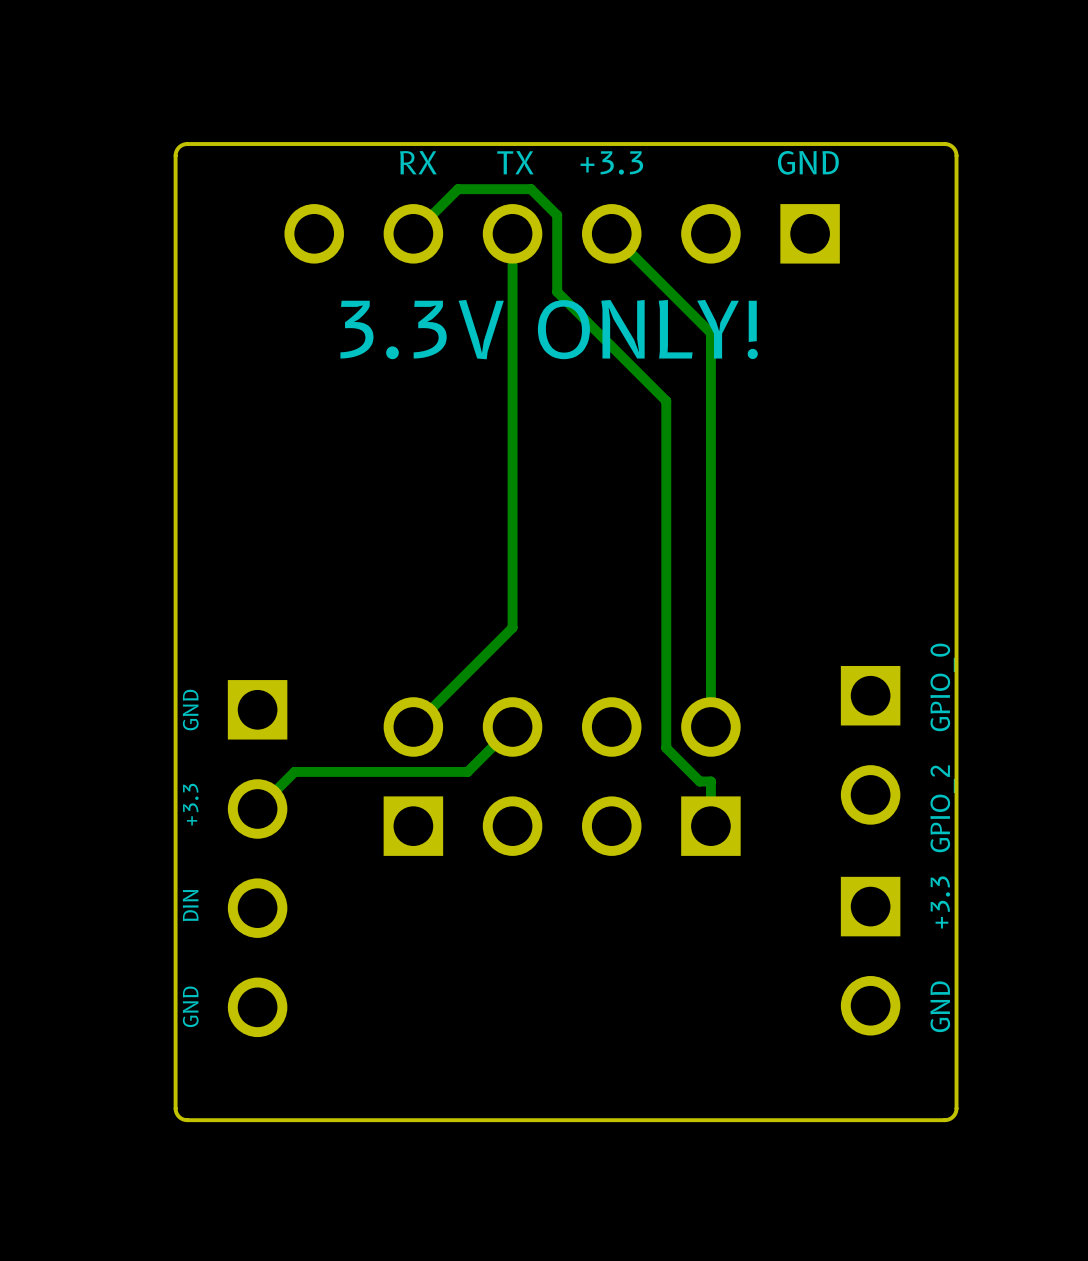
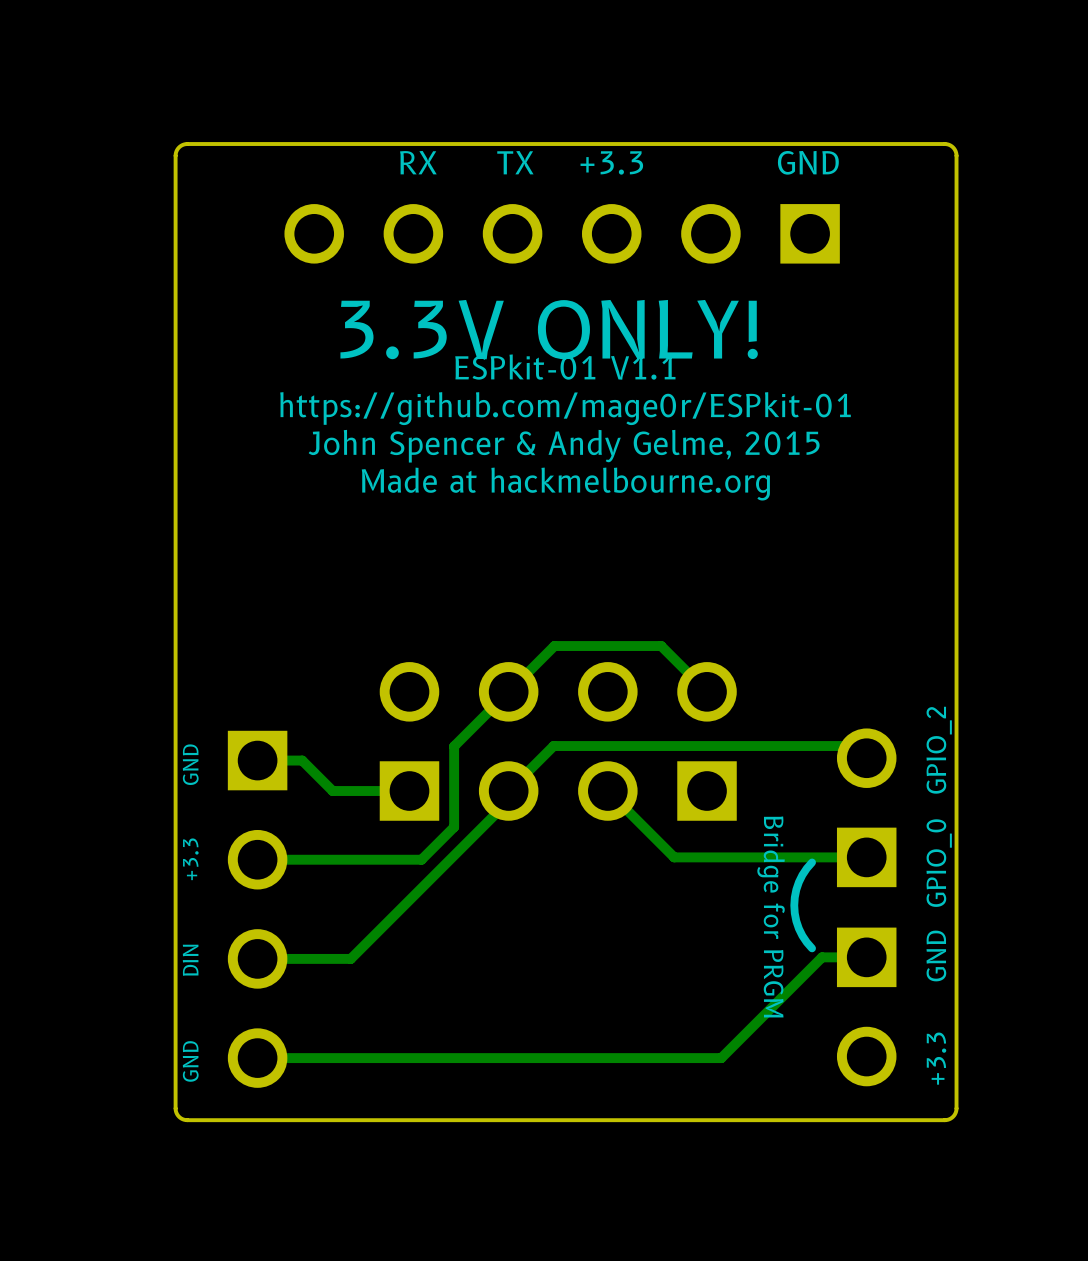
track: (413, 233) (458, 189) (531, 189) (557, 215) (557, 291) (666, 401) (666, 748) (699, 781) (710, 781) (710, 826) -> none
track: (512, 233) (512, 627) (413, 726) -> none
track: (611, 233) (710, 333) (710, 726) -> none
text: none -> ESPkit-01 V1.1 (565, 367)
text: none -> https://github.com/mage0r/ESPkit-01 (565, 408)
text: none -> John Spencer & Andy Gelme, 2015 (564, 446)
text: none -> Made at hackmelbourne.org (565, 484)
text position: GPIO_0 (943, 687) -> GPIO_0 (939, 863)
track: none -> (707, 691) (661, 646) (554, 646) (454, 746) (454, 827) (421, 859) (257, 859)
text position: GND (190, 710) -> GND (190, 764)
track: (512, 726) (467, 771) (294, 771) (257, 808) -> none
part rotation: 0° (870, 745) -> 180° (866, 807)
track: none -> (866, 758) (854, 746) (553, 746) (508, 791) (508, 801) (350, 958) (257, 958)
track: none -> (257, 760) (302, 760) (332, 791) (409, 791)
part position: (562, 776) -> (558, 741)
track: none -> (607, 791) (674, 857) (866, 857)
text position: +3.3 (190, 804) -> +3.3 (190, 859)
text position: GPIO_2 (943, 808) -> GPIO_2 (939, 750)
part position: (257, 858) -> (257, 909)
line: none -> (812, 862) (798, 882) (794, 905) (798, 928) (812, 948)
text position: +3.3 (940, 902) -> +3.3 (936, 1058)
text position: DIN (190, 905) -> DIN (190, 960)
text: none -> Bridge for PRGM (771, 916)
part position: (870, 956) -> (866, 1006)
track: none -> (866, 957) (822, 957) (721, 1058) (257, 1058)
text position: GND (190, 1006) -> GND (190, 1061)
text position: GND (940, 1006) -> GND (936, 956)

